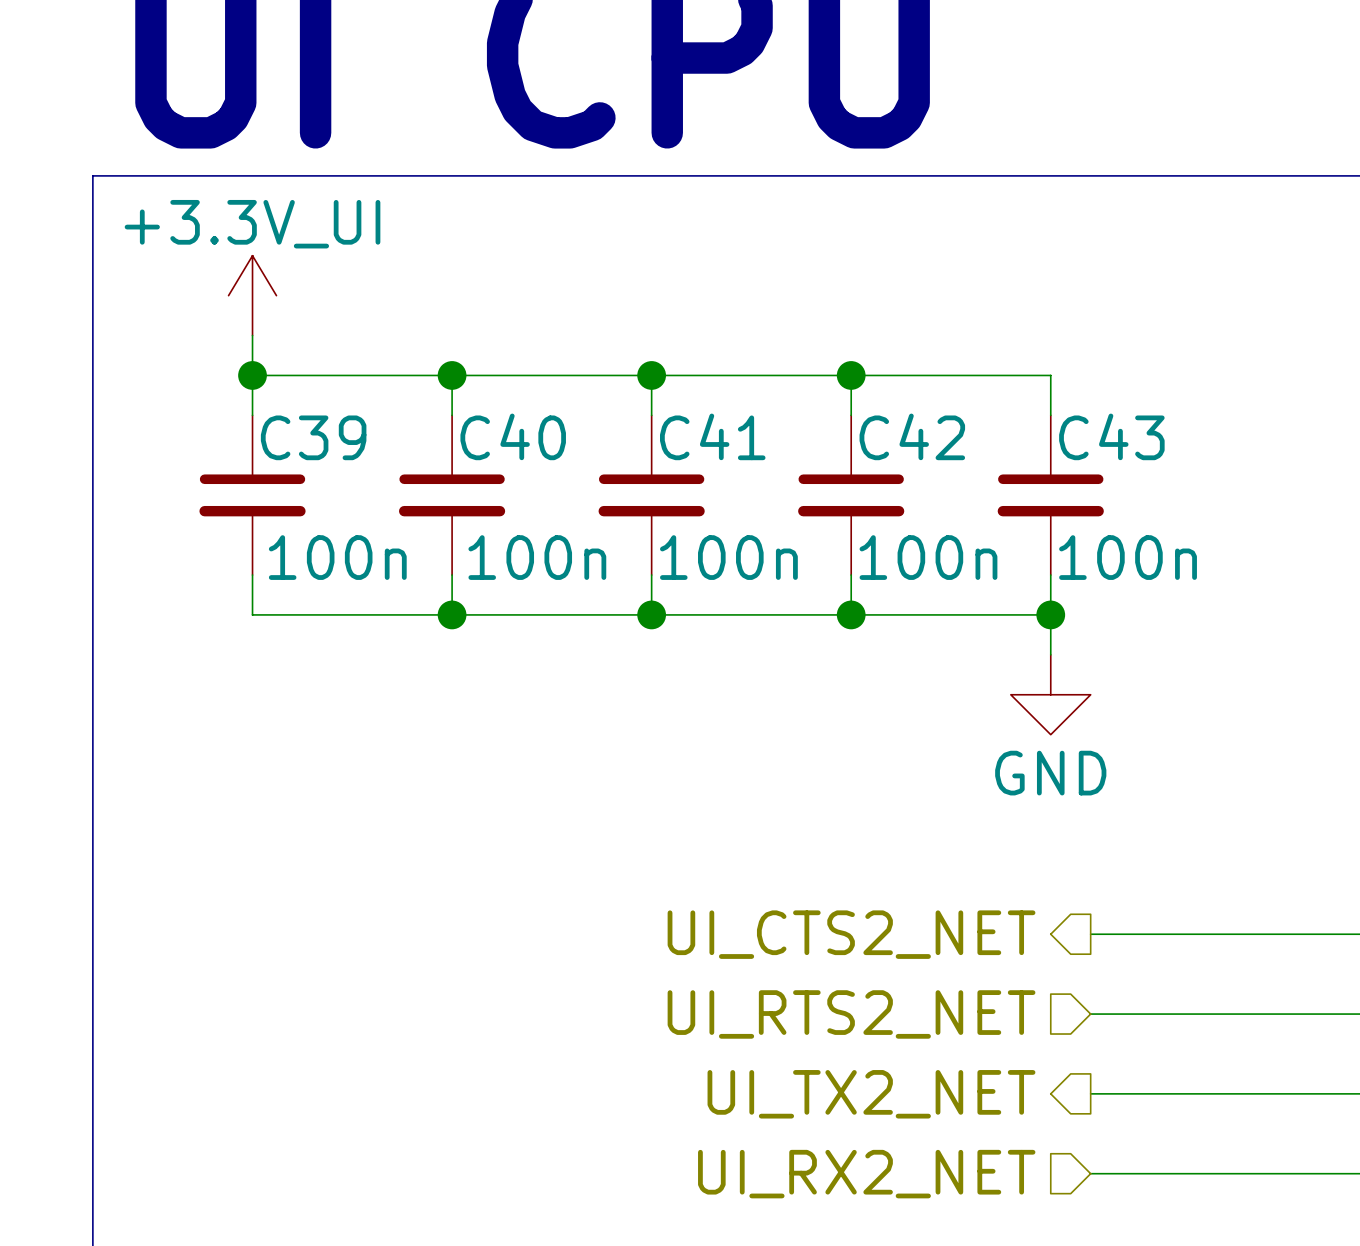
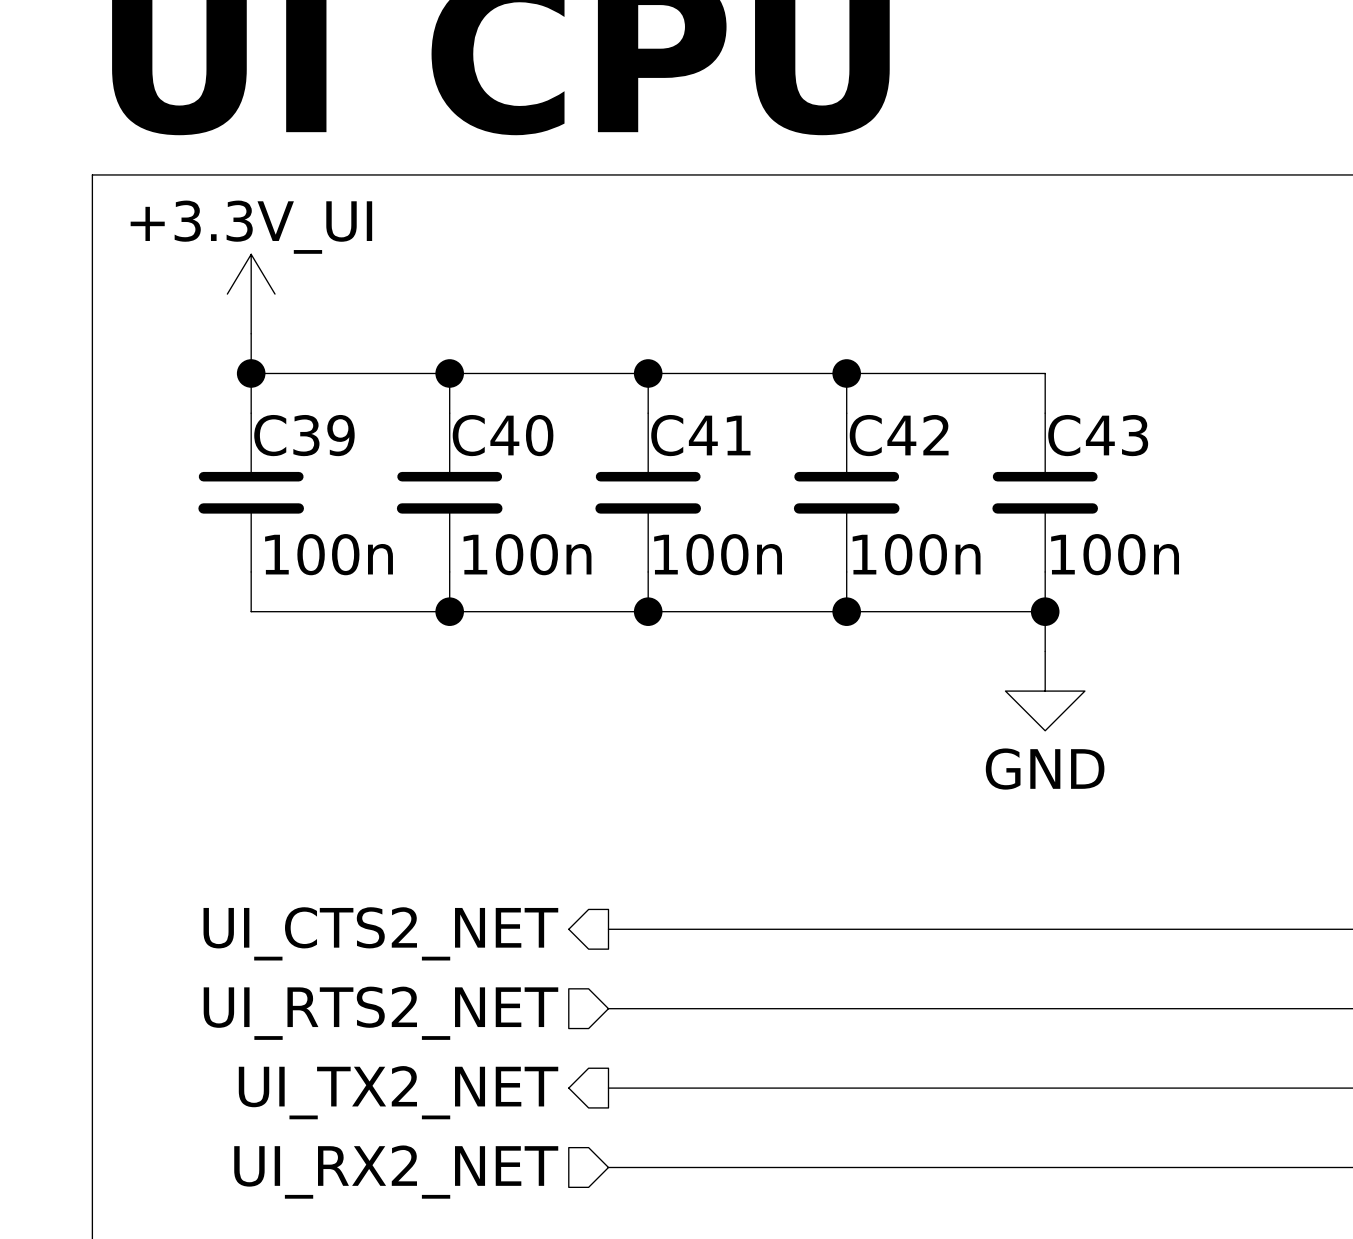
wire: none -> (608, 929) (1084, 929)
hierarchical label position: UI_CTS2_NET (851, 934) -> UI_CTS2_NET (380, 933)
wire: none -> (608, 1008) (1084, 1008)
hierarchical label position: UI_RTS2_NET (851, 1014) -> UI_RTS2_NET (380, 1013)
wire: none -> (608, 1088) (1084, 1088)
hierarchical label position: UI_TX2_NET (871, 1094) -> UI_TX2_NET (398, 1092)
wire: none -> (608, 1167) (1084, 1167)
hierarchical label position: UI_RX2_NET (866, 1174) -> UI_RX2_NET (396, 1172)

